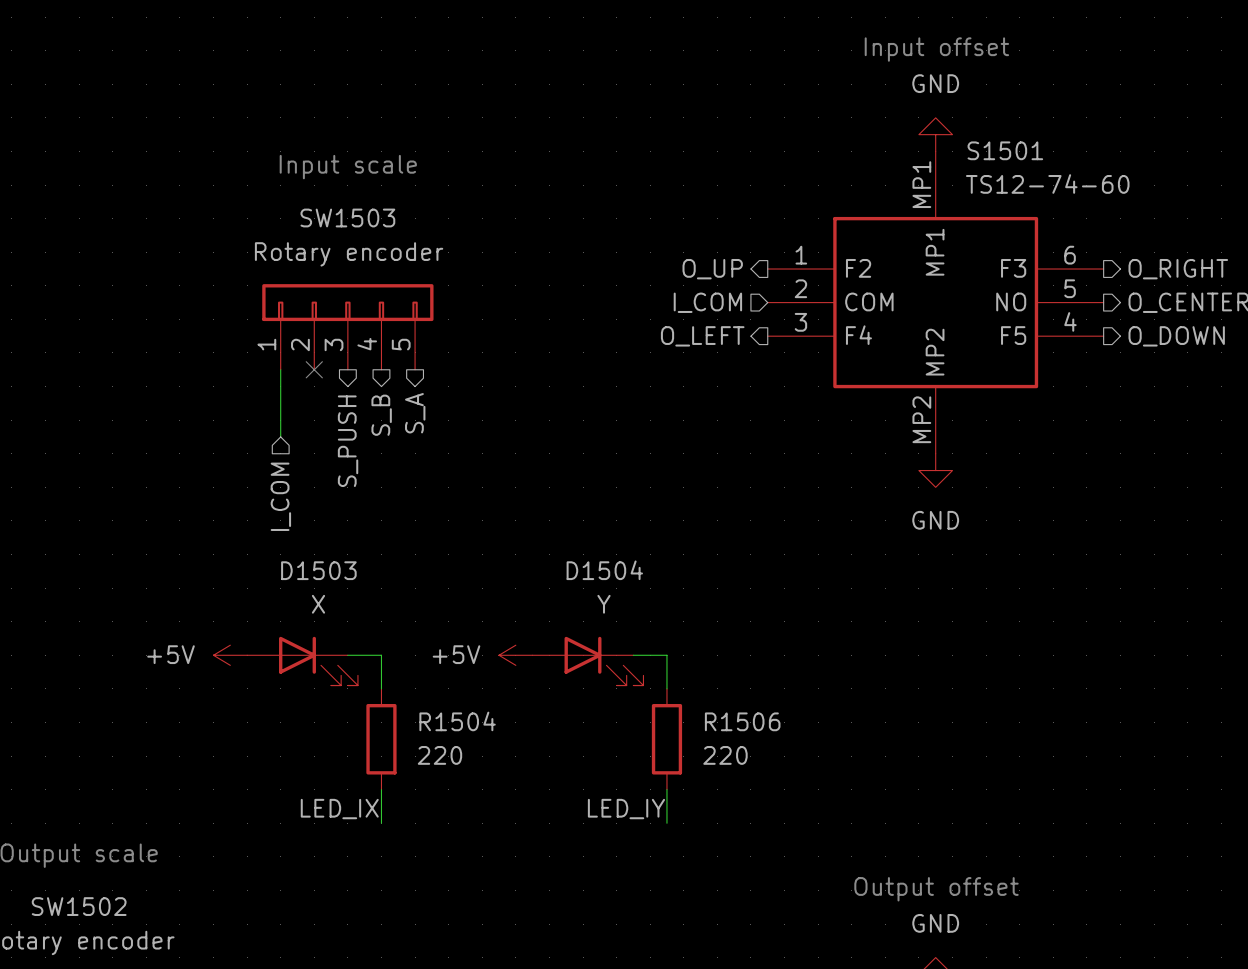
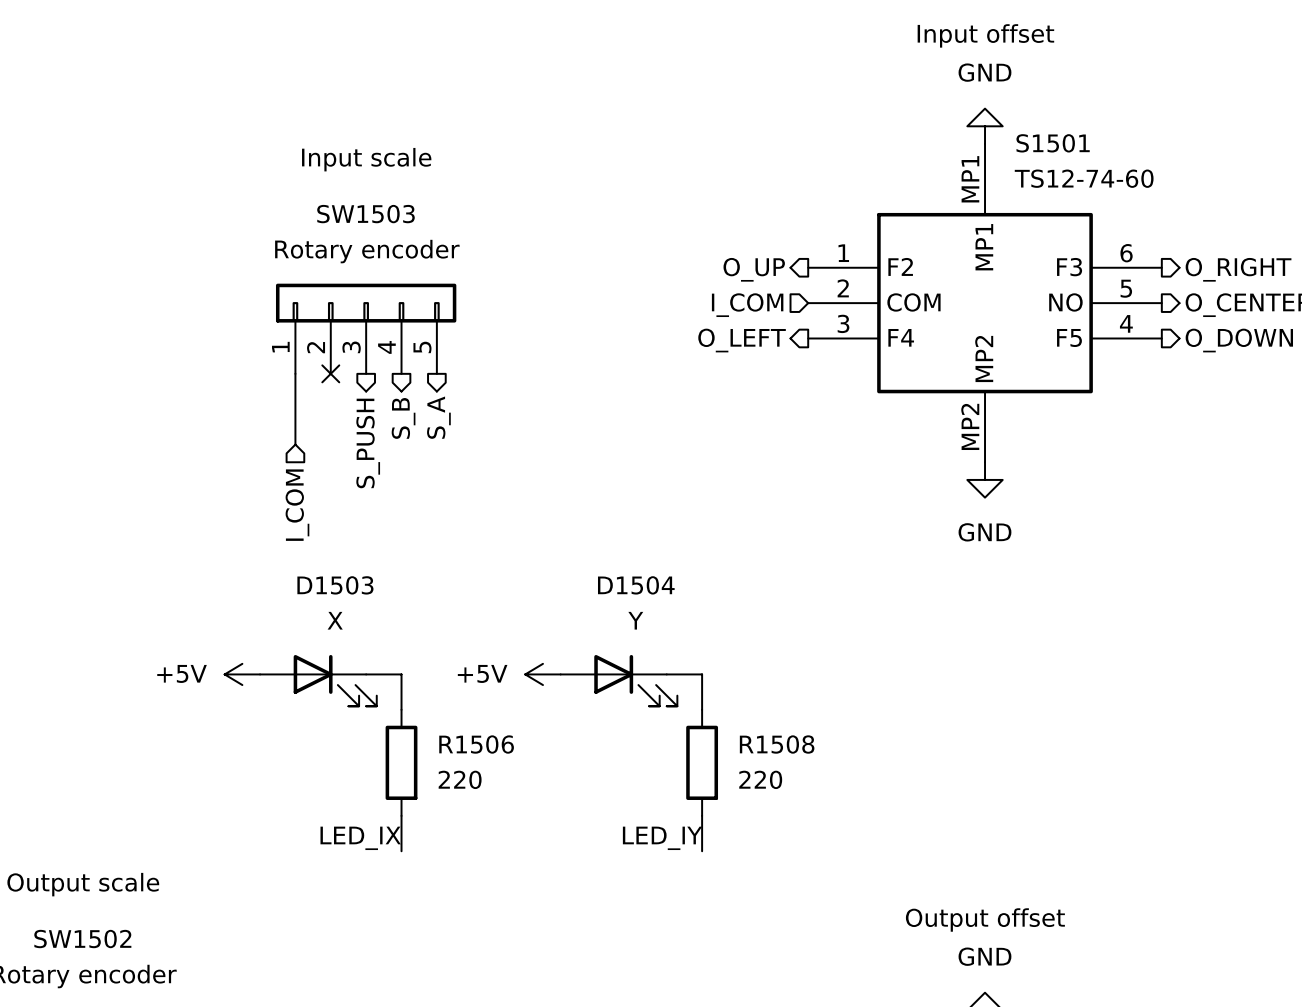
R1504 name: R1504 (457, 721) -> R1506 (476, 744)
R1506 name: R1506 (742, 721) -> R1508 (777, 744)

